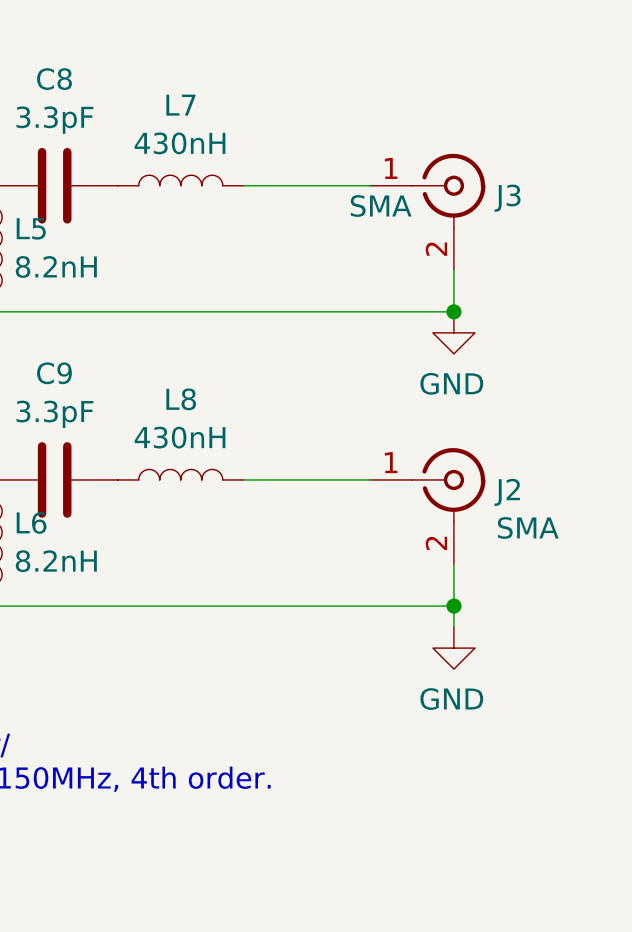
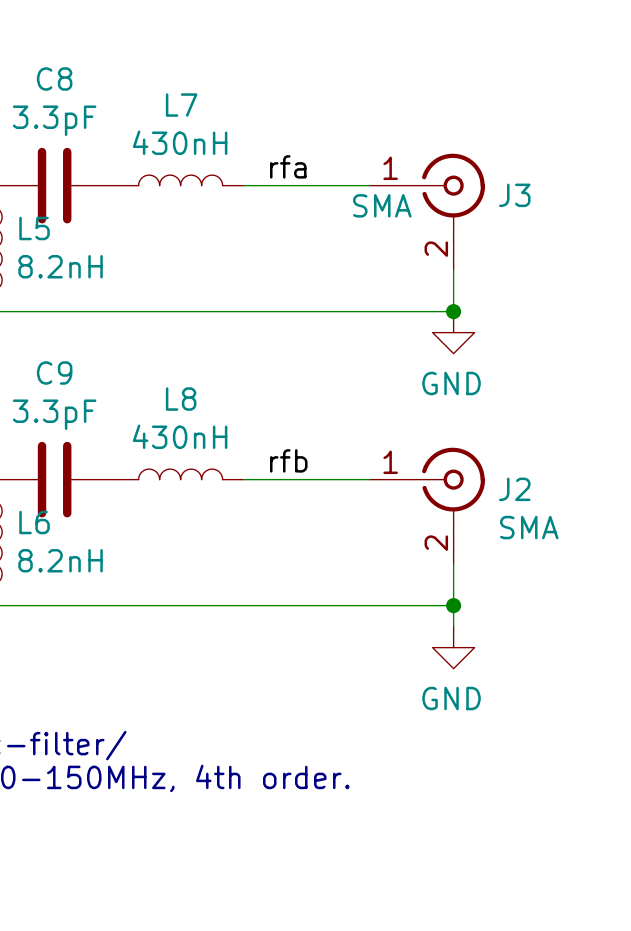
label: none -> rfa (288, 166)
label: none -> rfb (288, 460)

